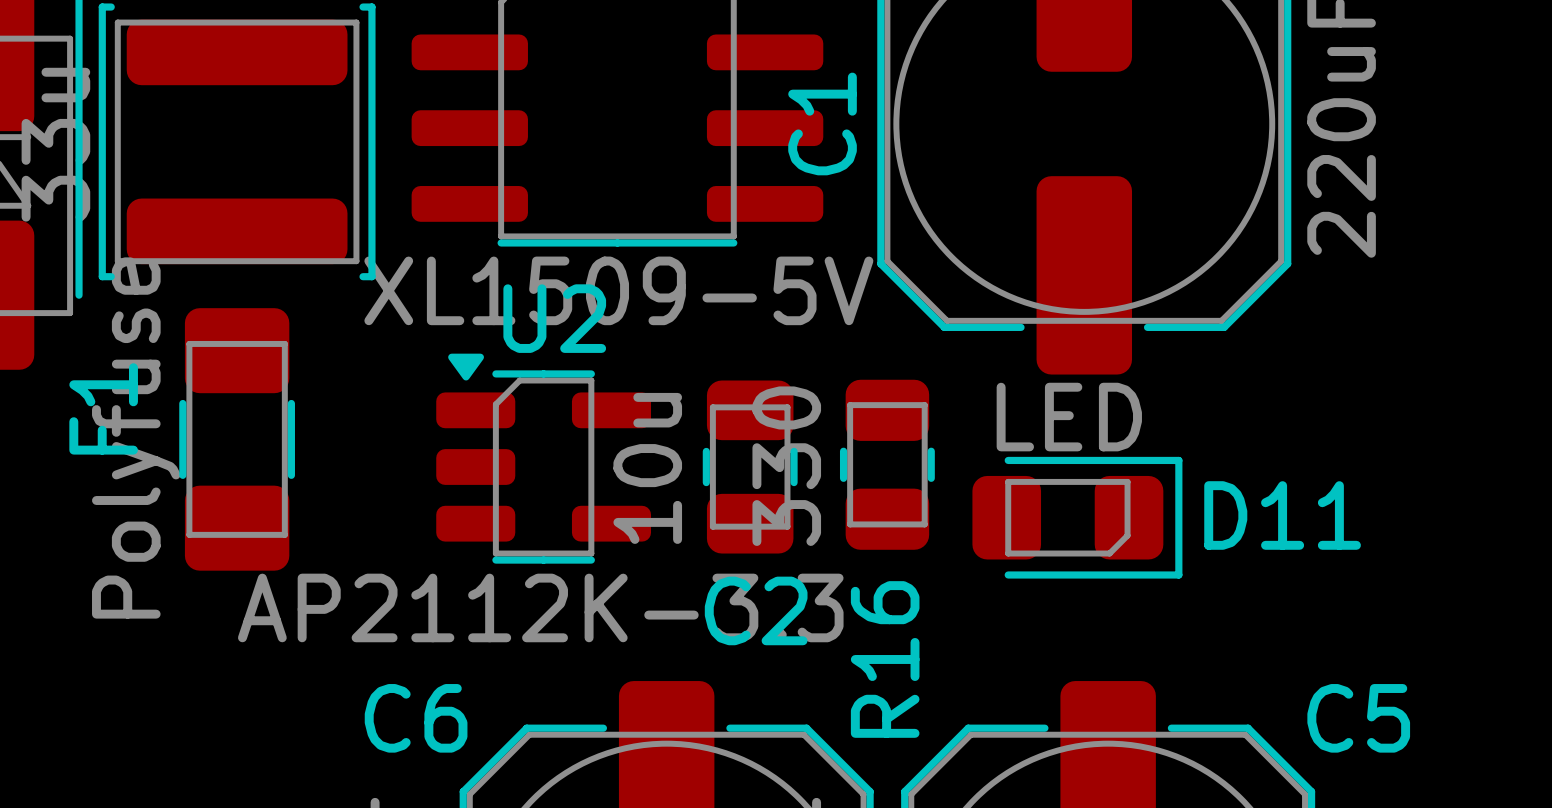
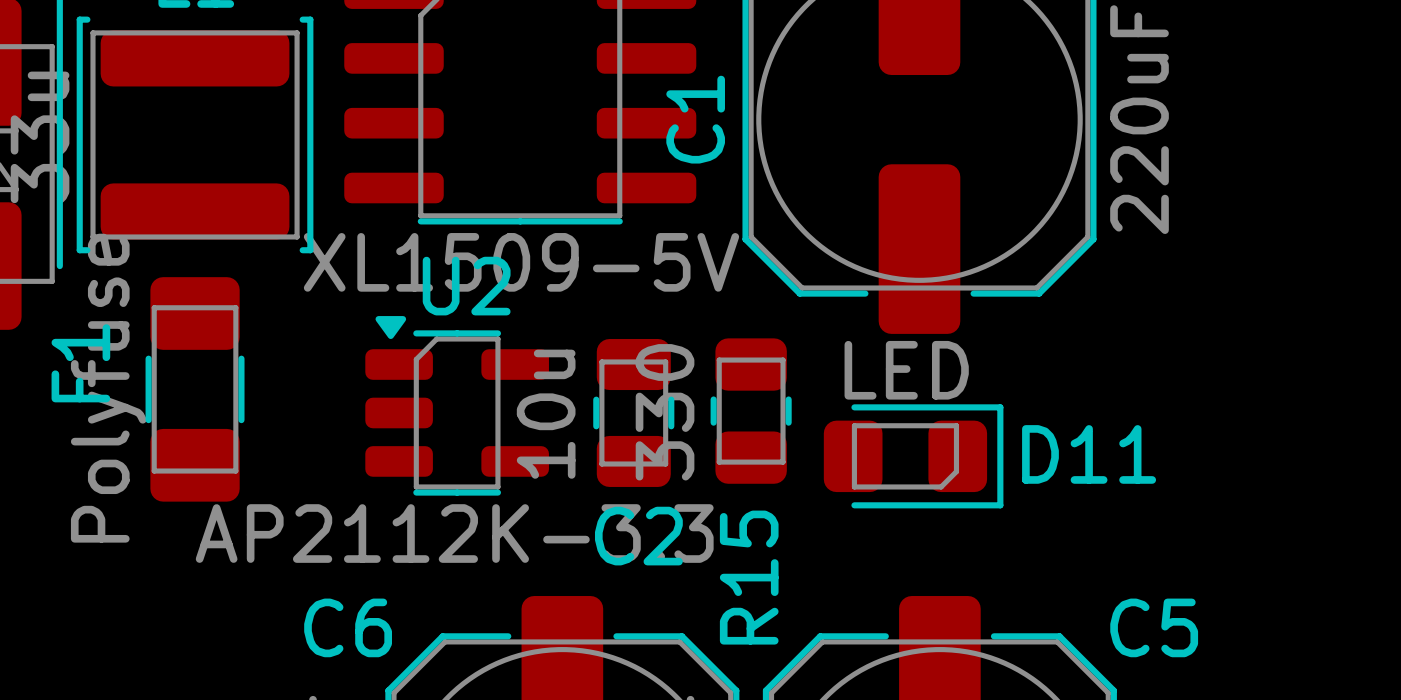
R16 name: R16 (885, 659) -> R15 (749, 577)

